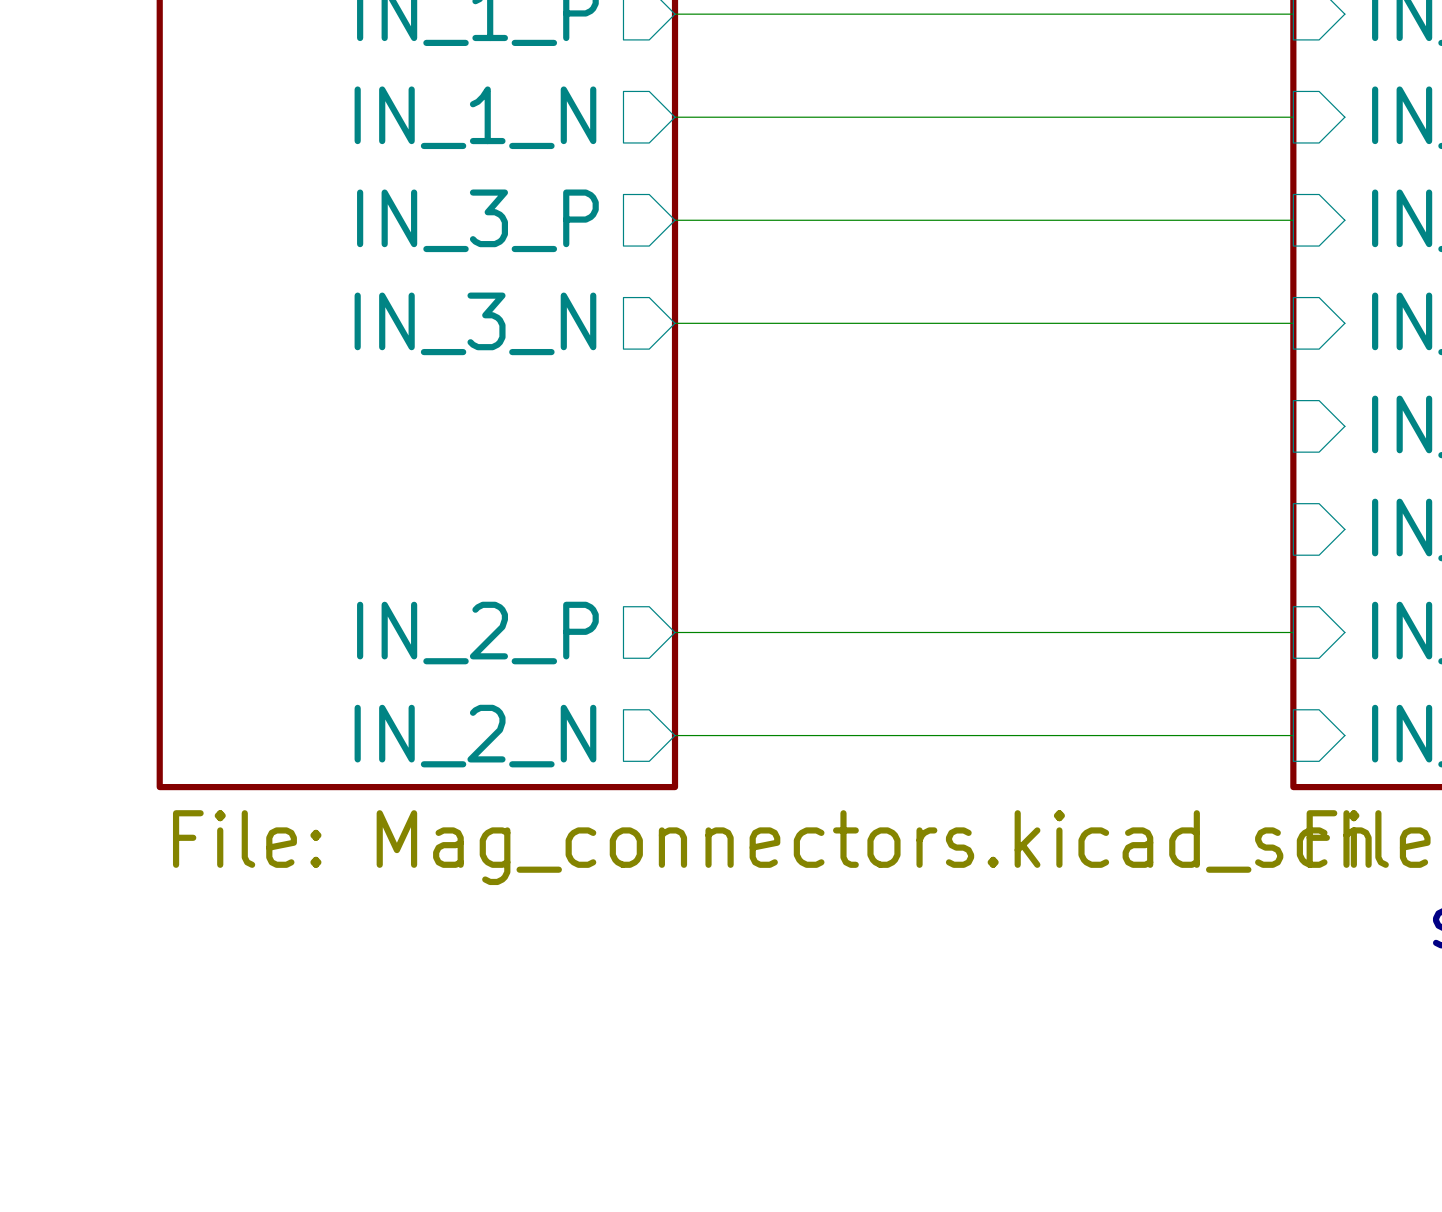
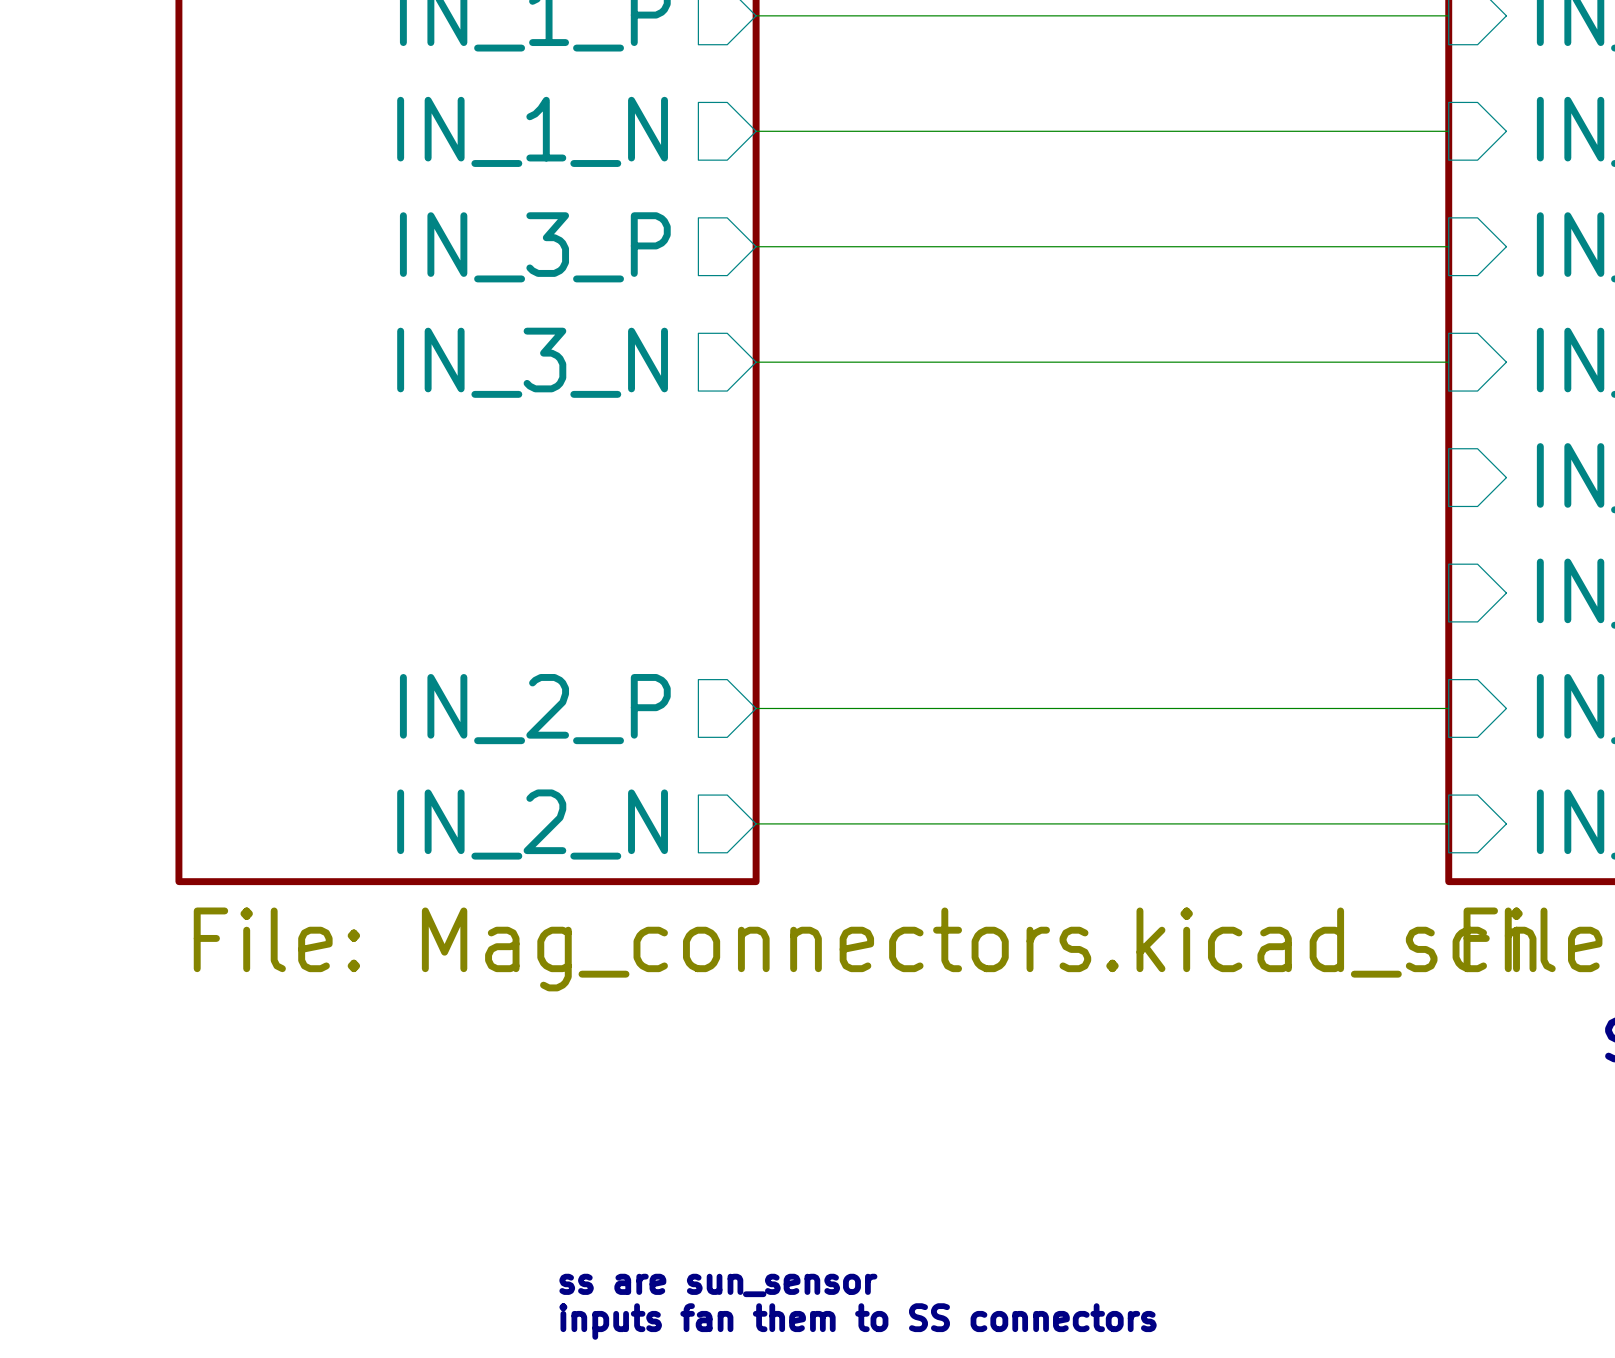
text: none -> ss are sun_sensor (718, 1285)
text: none -> inputs fan them to SS connectors (858, 1321)

